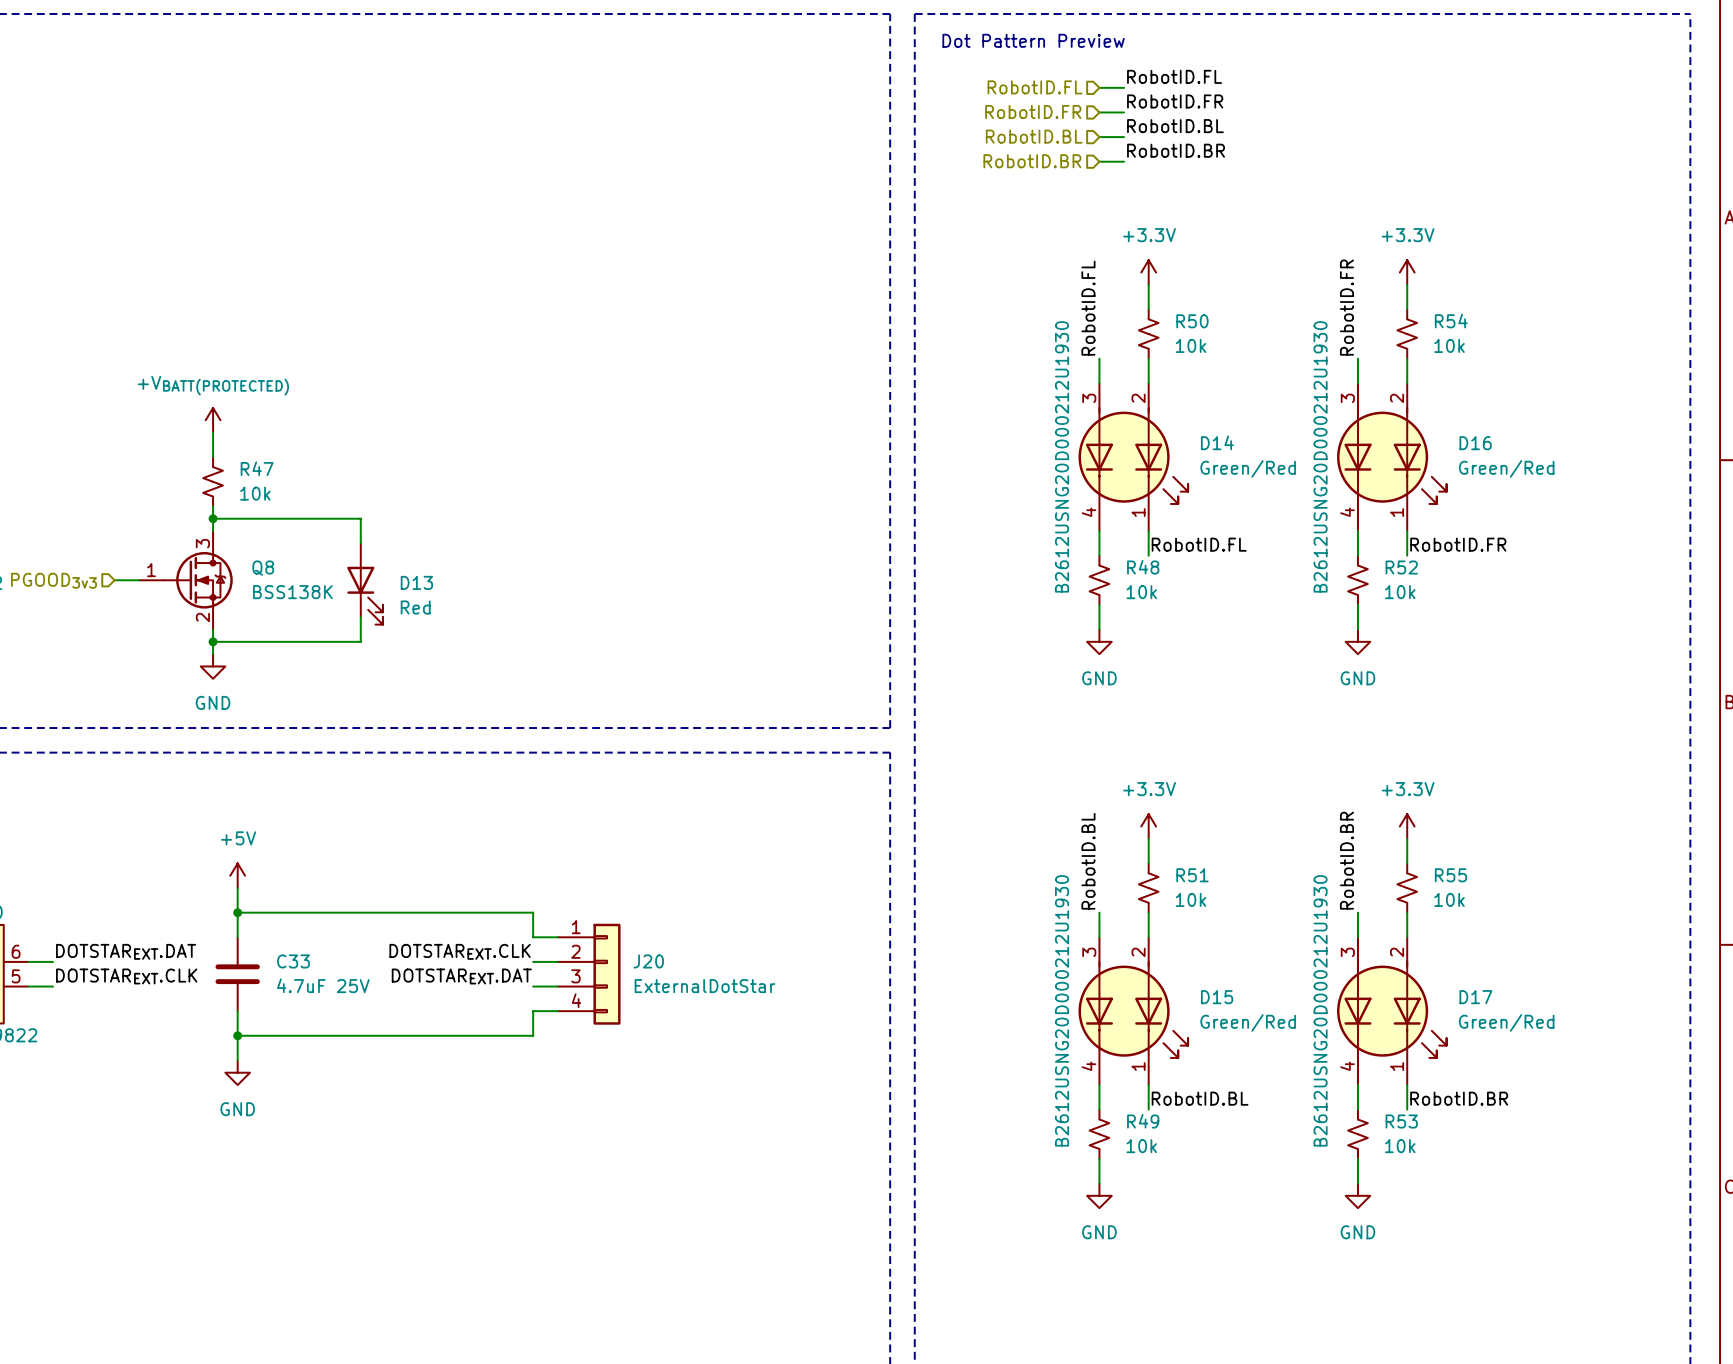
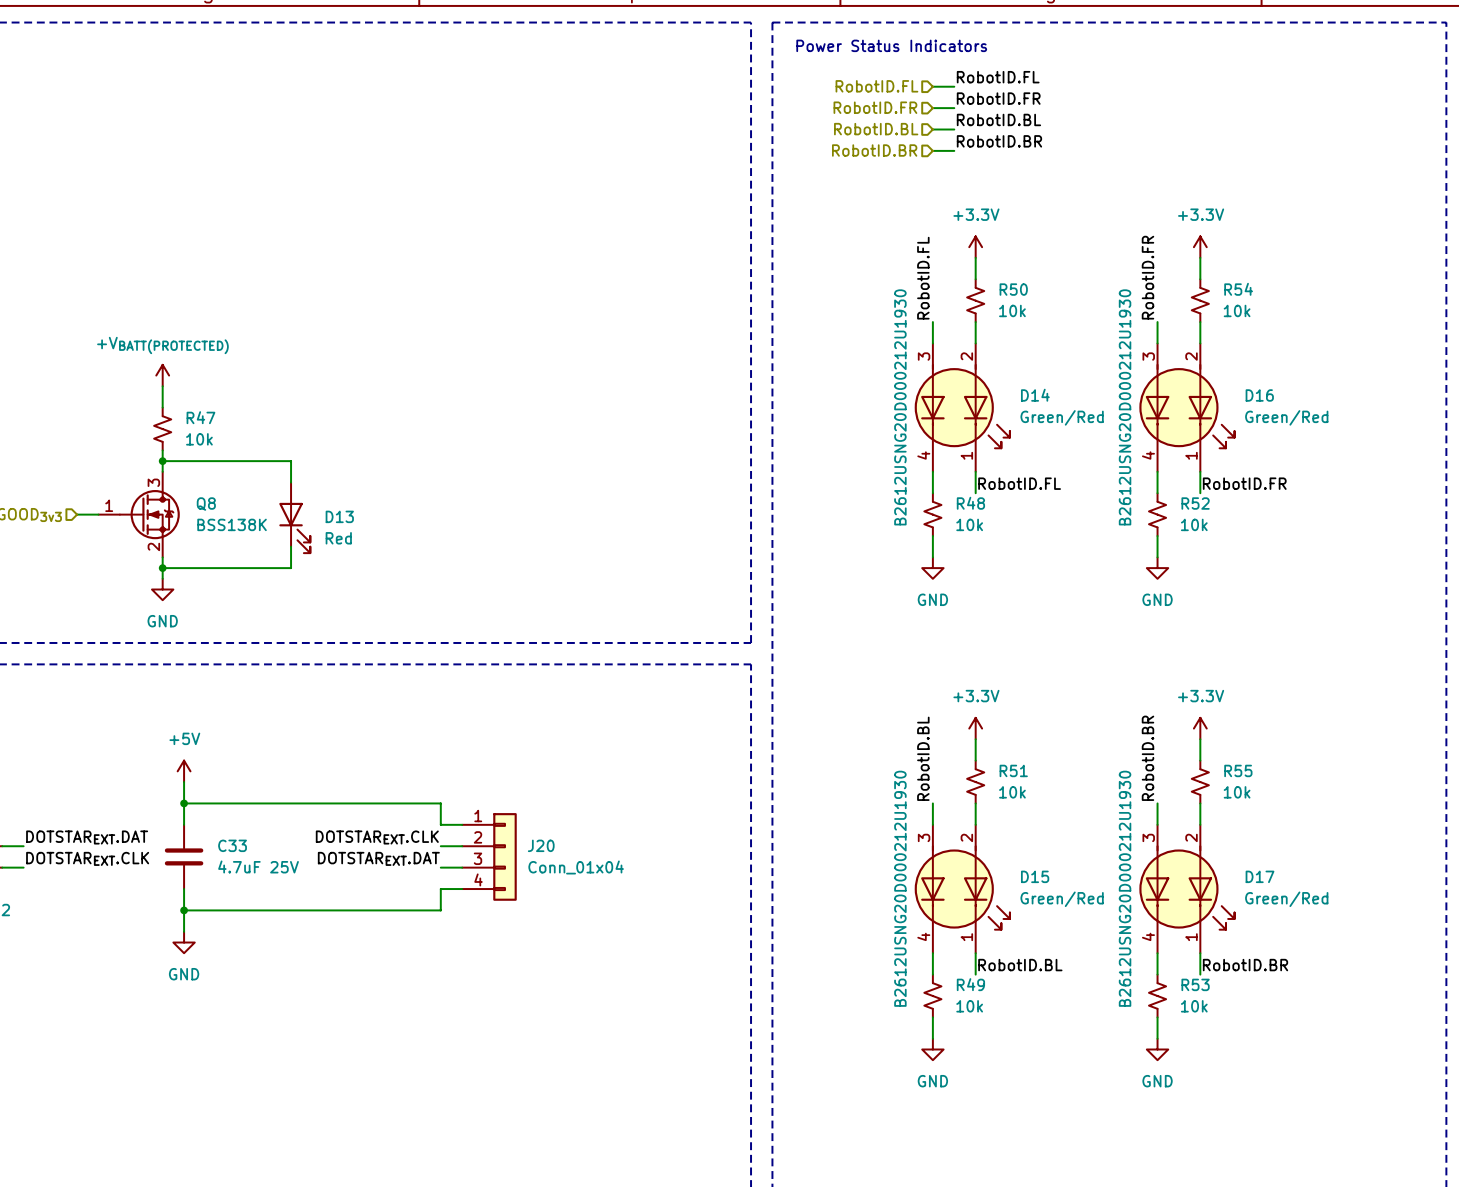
text: Dot Pattern Preview (1033, 40) -> Power Status Indicators (891, 45)
J20 value: ExternalDotStar (705, 986) -> Conn_01x04 (576, 867)

